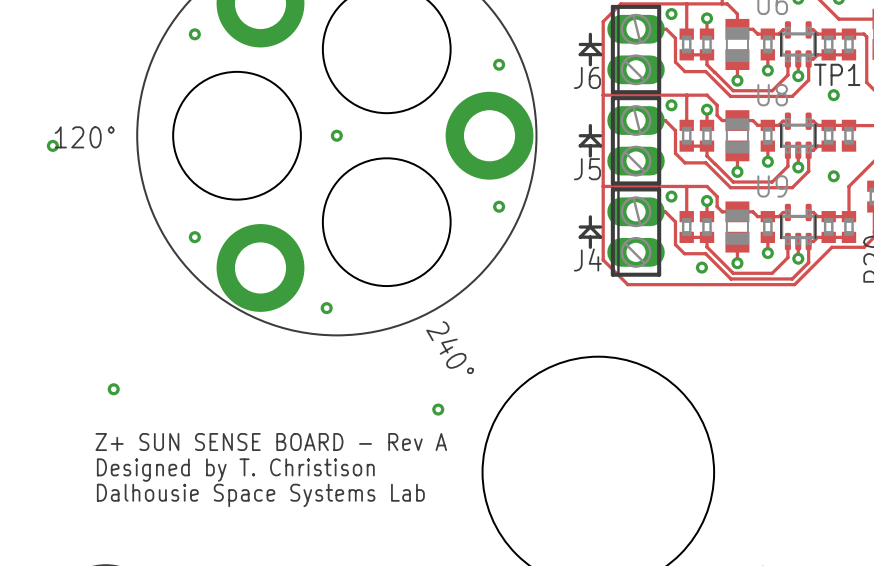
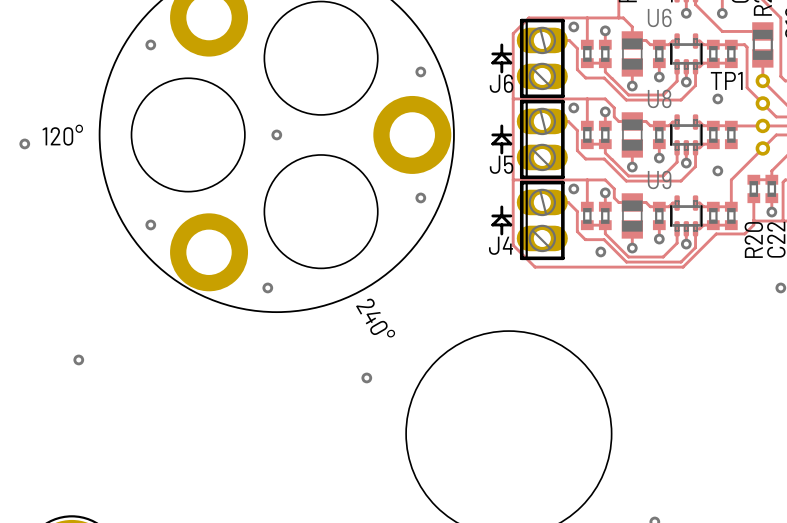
text: Z+ SUN SENSE BOARD - Rev A (271, 442) -> none
text: Designed by T. Christison (235, 470) -> none
text: Dalhousie Space Systems Lab (260, 495) -> none

